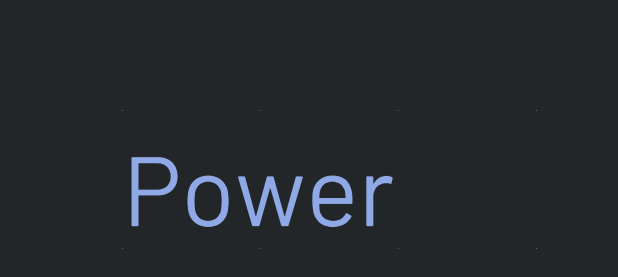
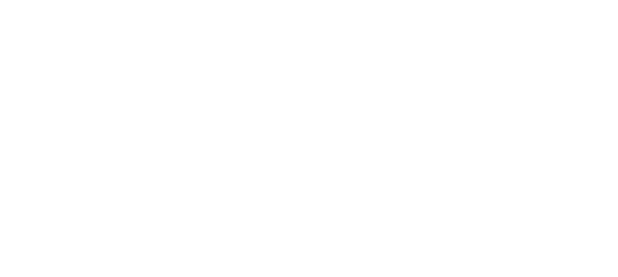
text: Power (262, 192) -> none

